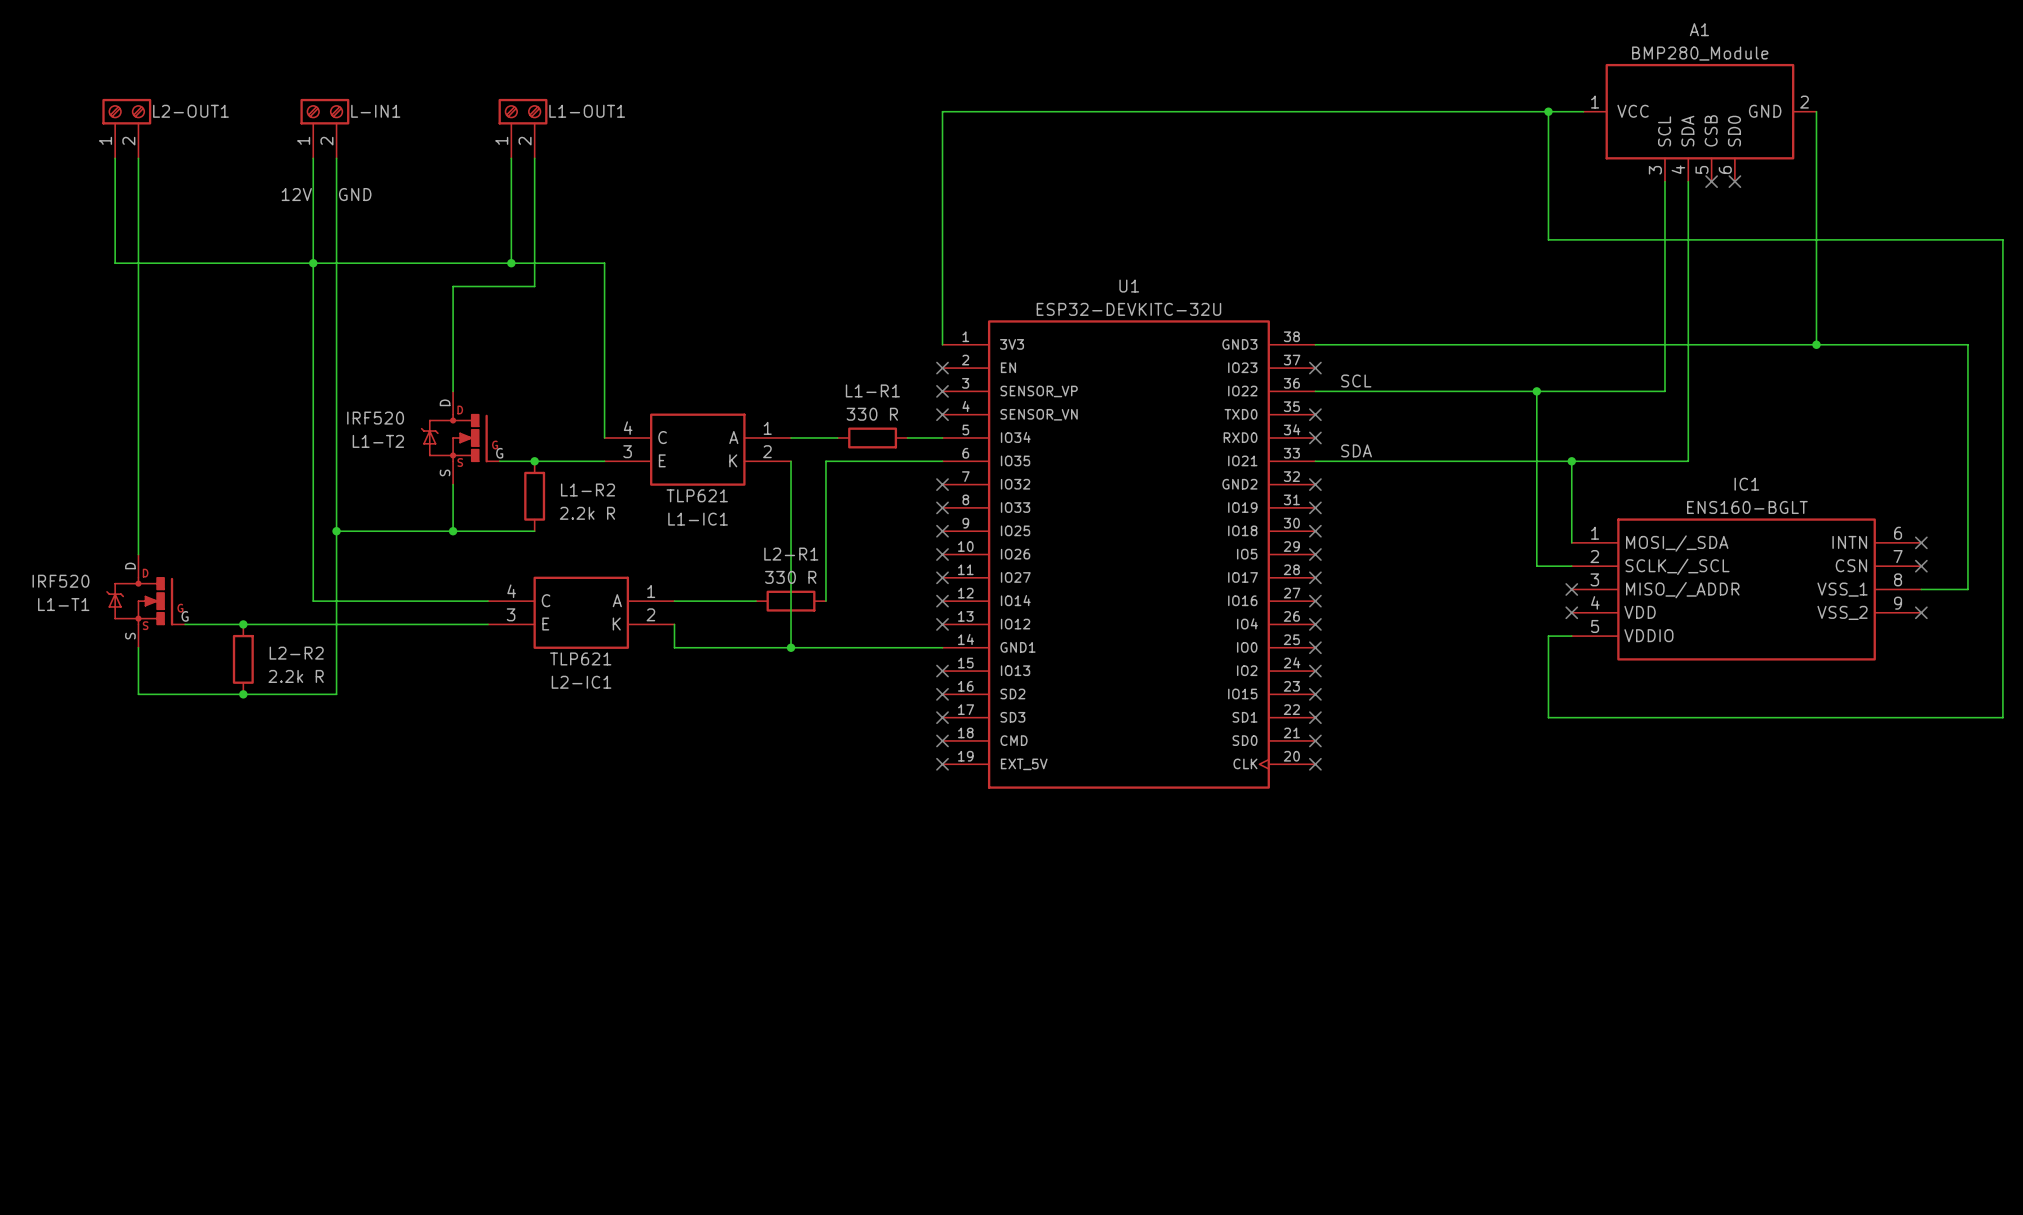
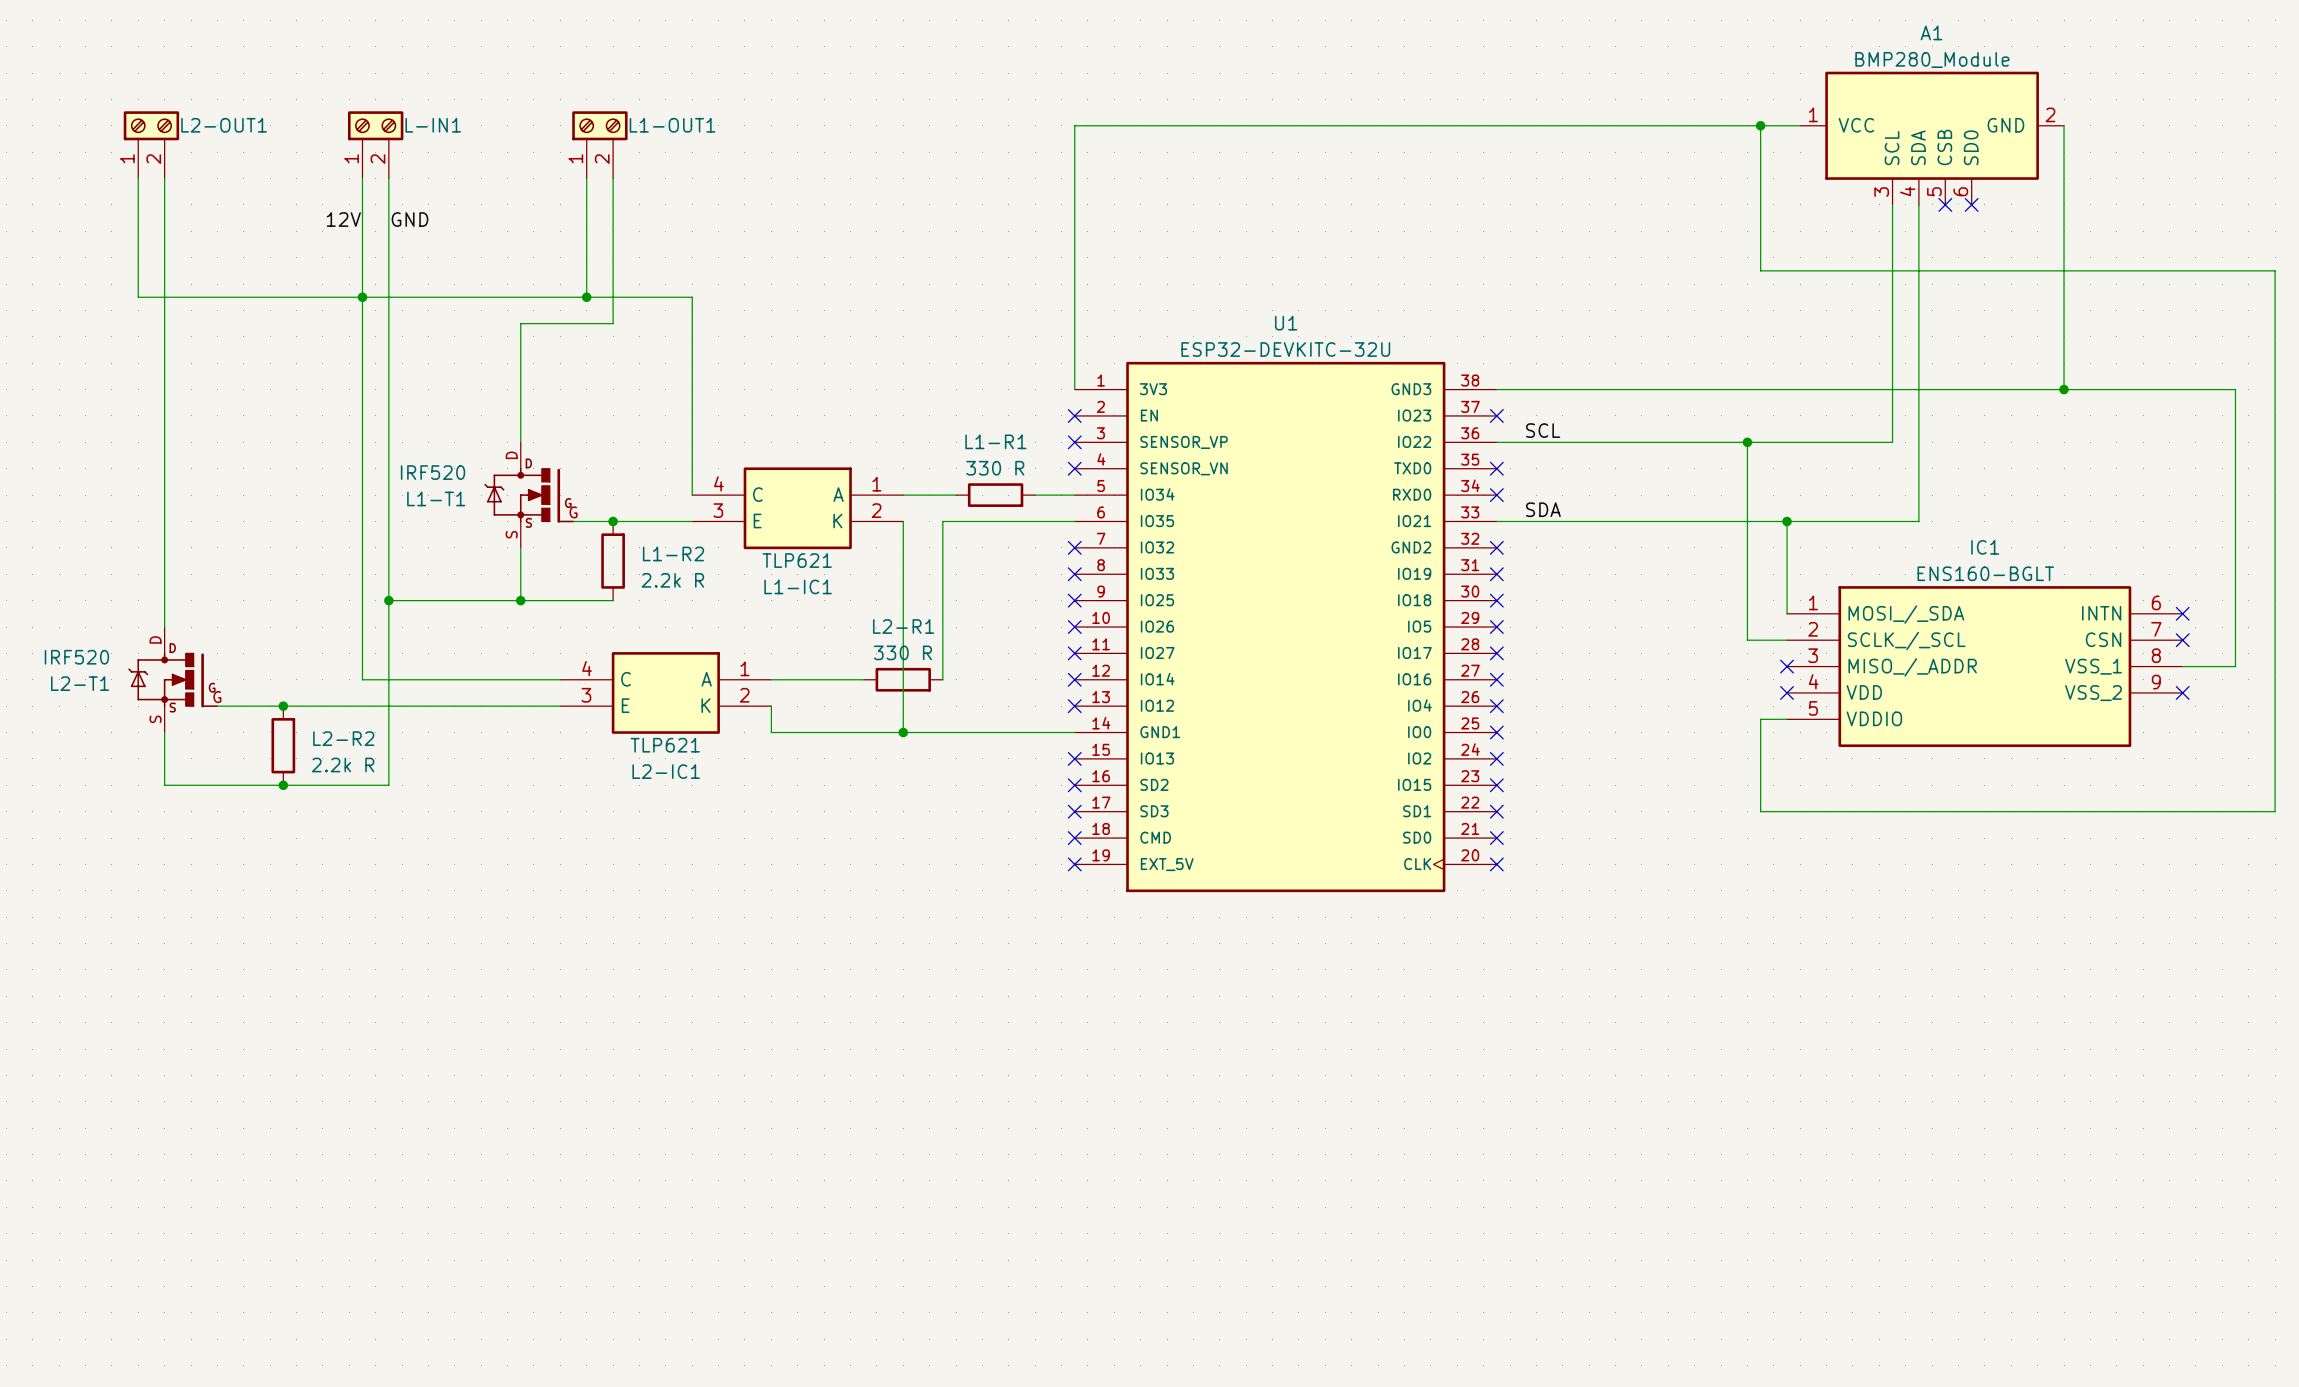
L1-T2 name: L1-T2 (378, 441) -> L1-T1 (436, 498)
L1-T1 name: L1-T1 (63, 604) -> L2-T1 (80, 683)

